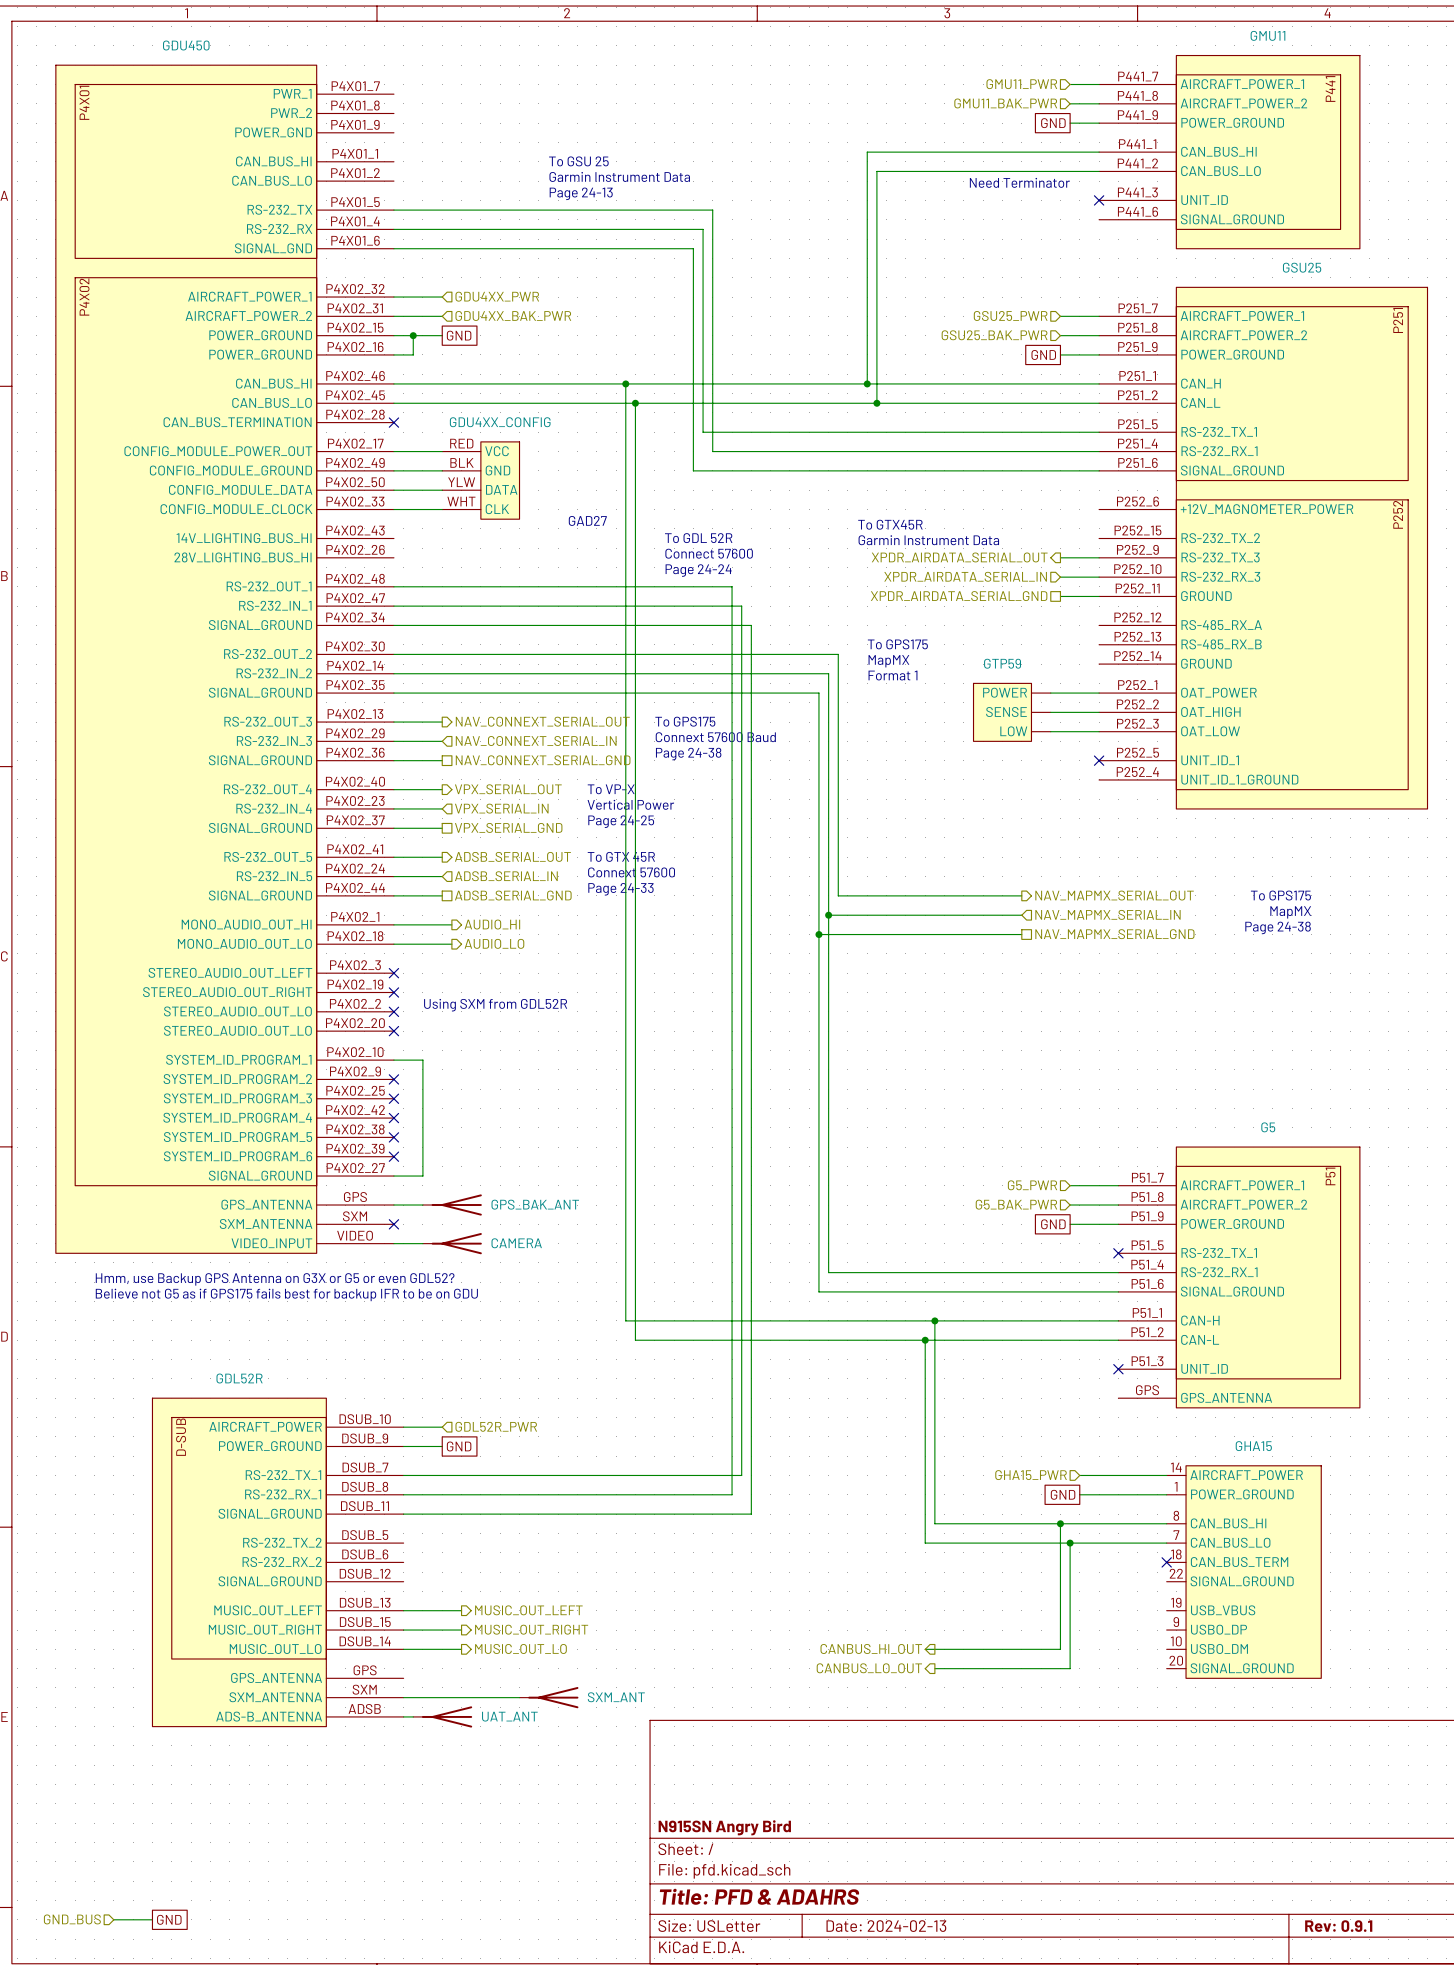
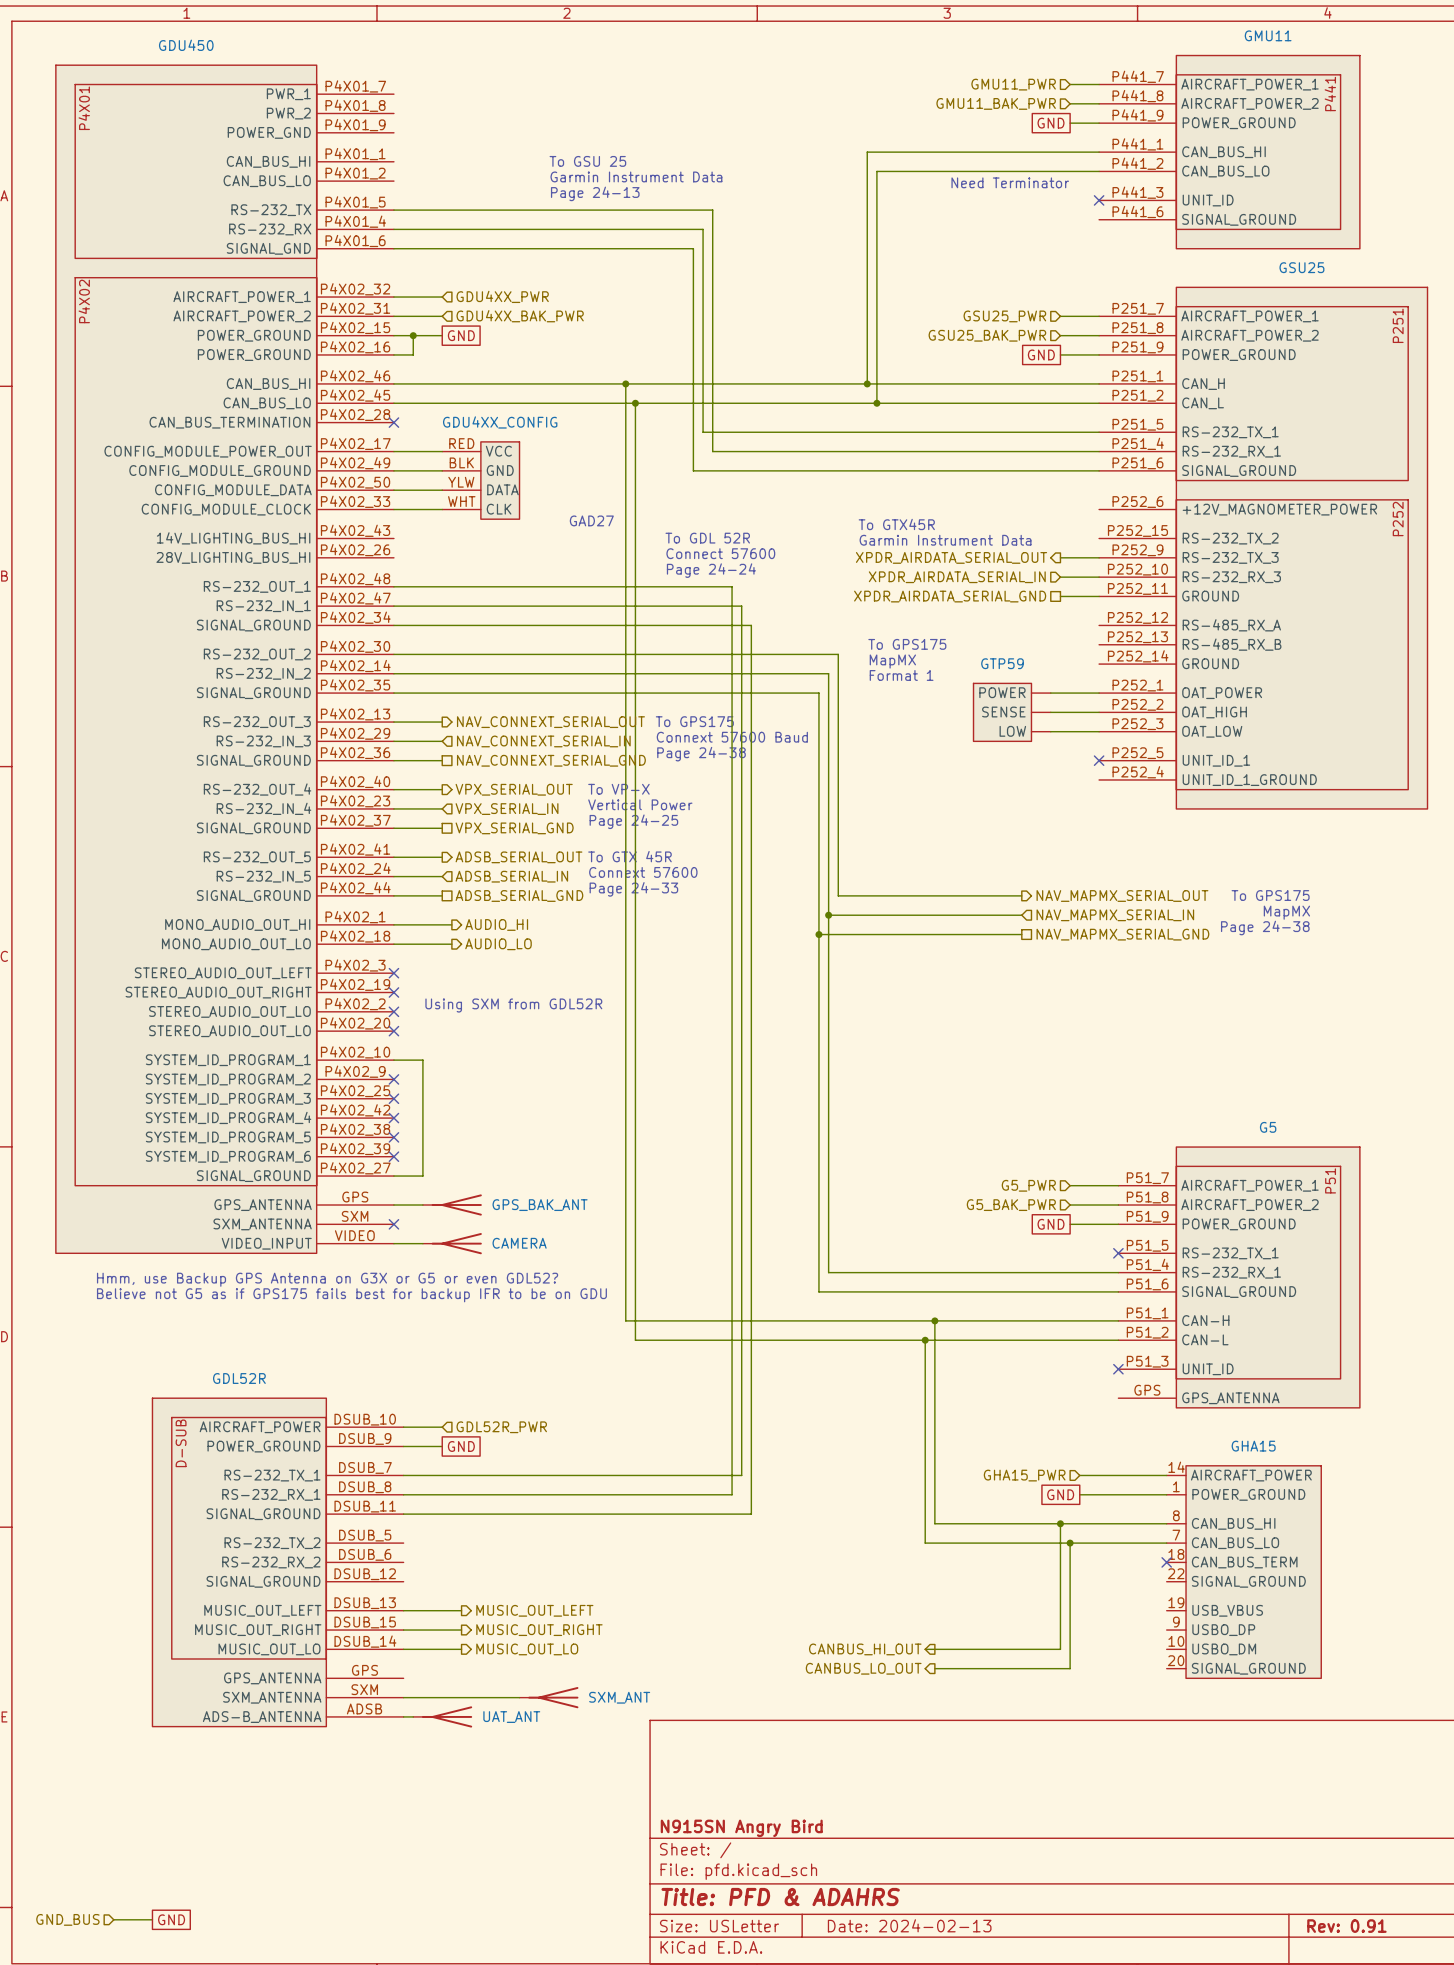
title block: Rev: 0.9.1 (1338, 1926) -> Rev: 0.91 (1346, 1926)

